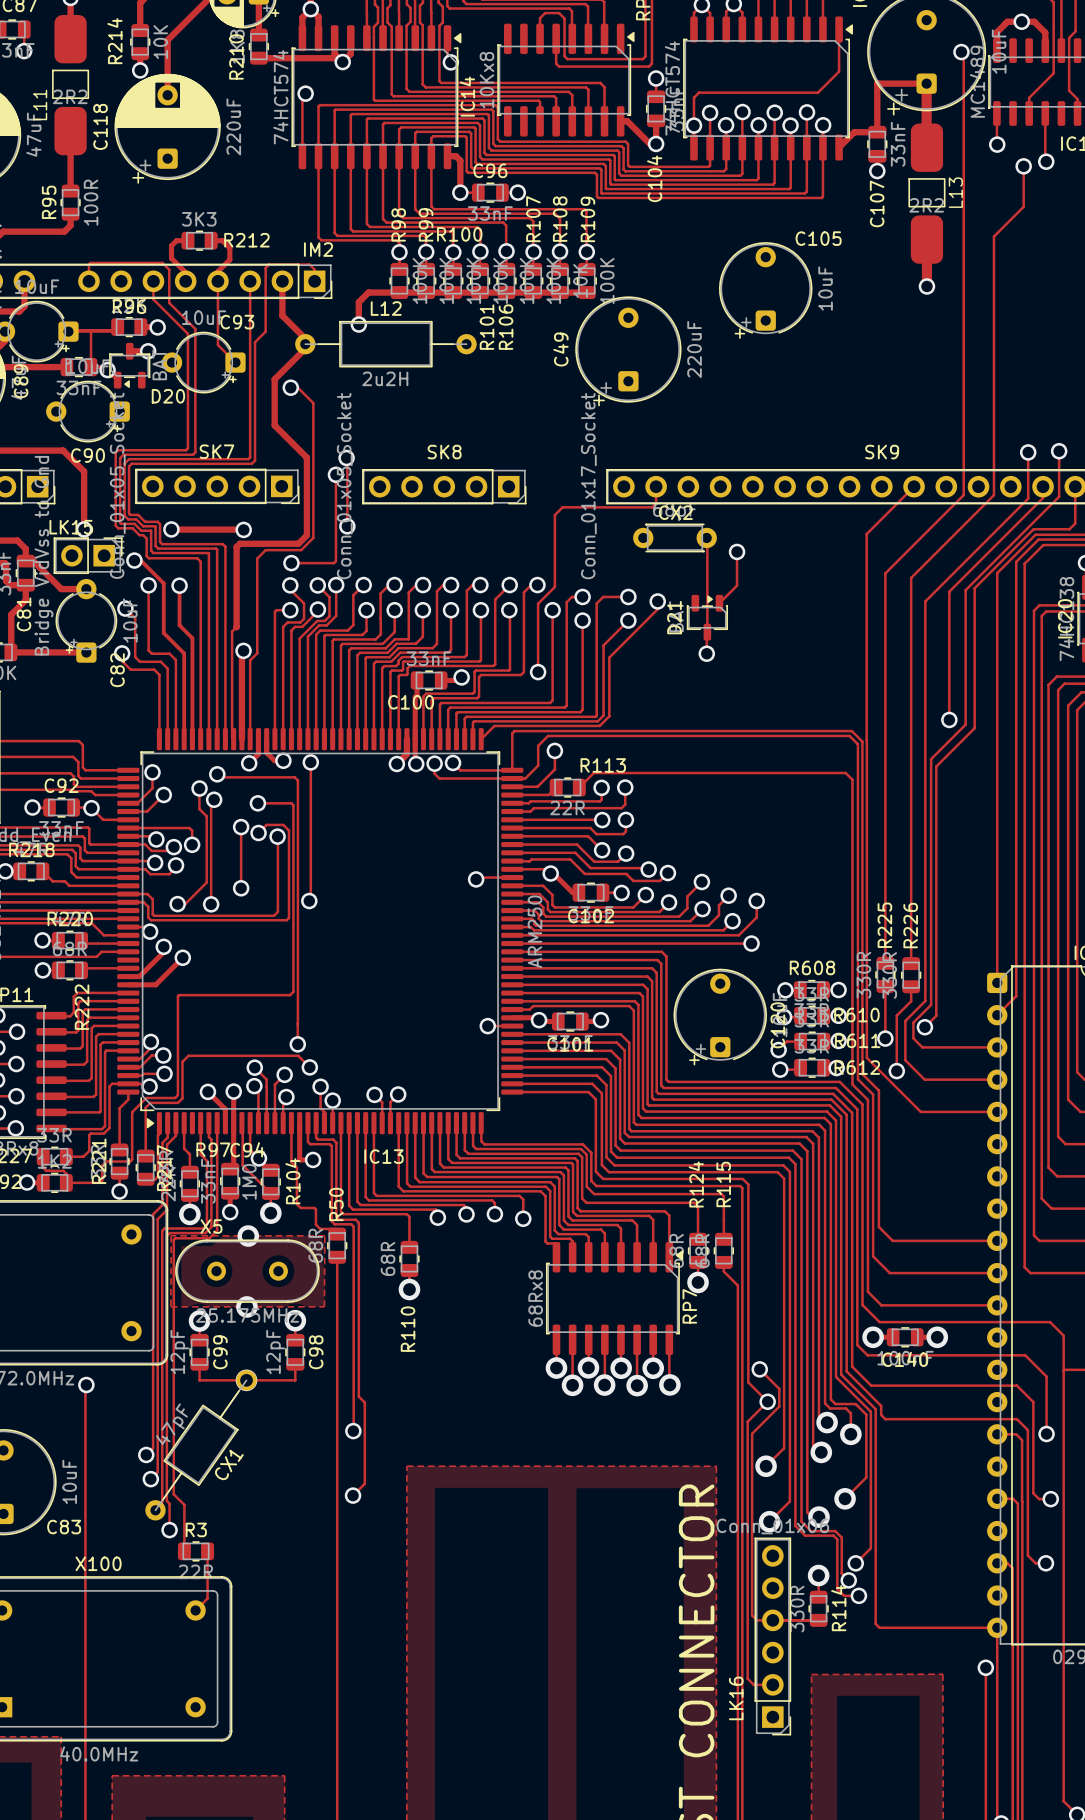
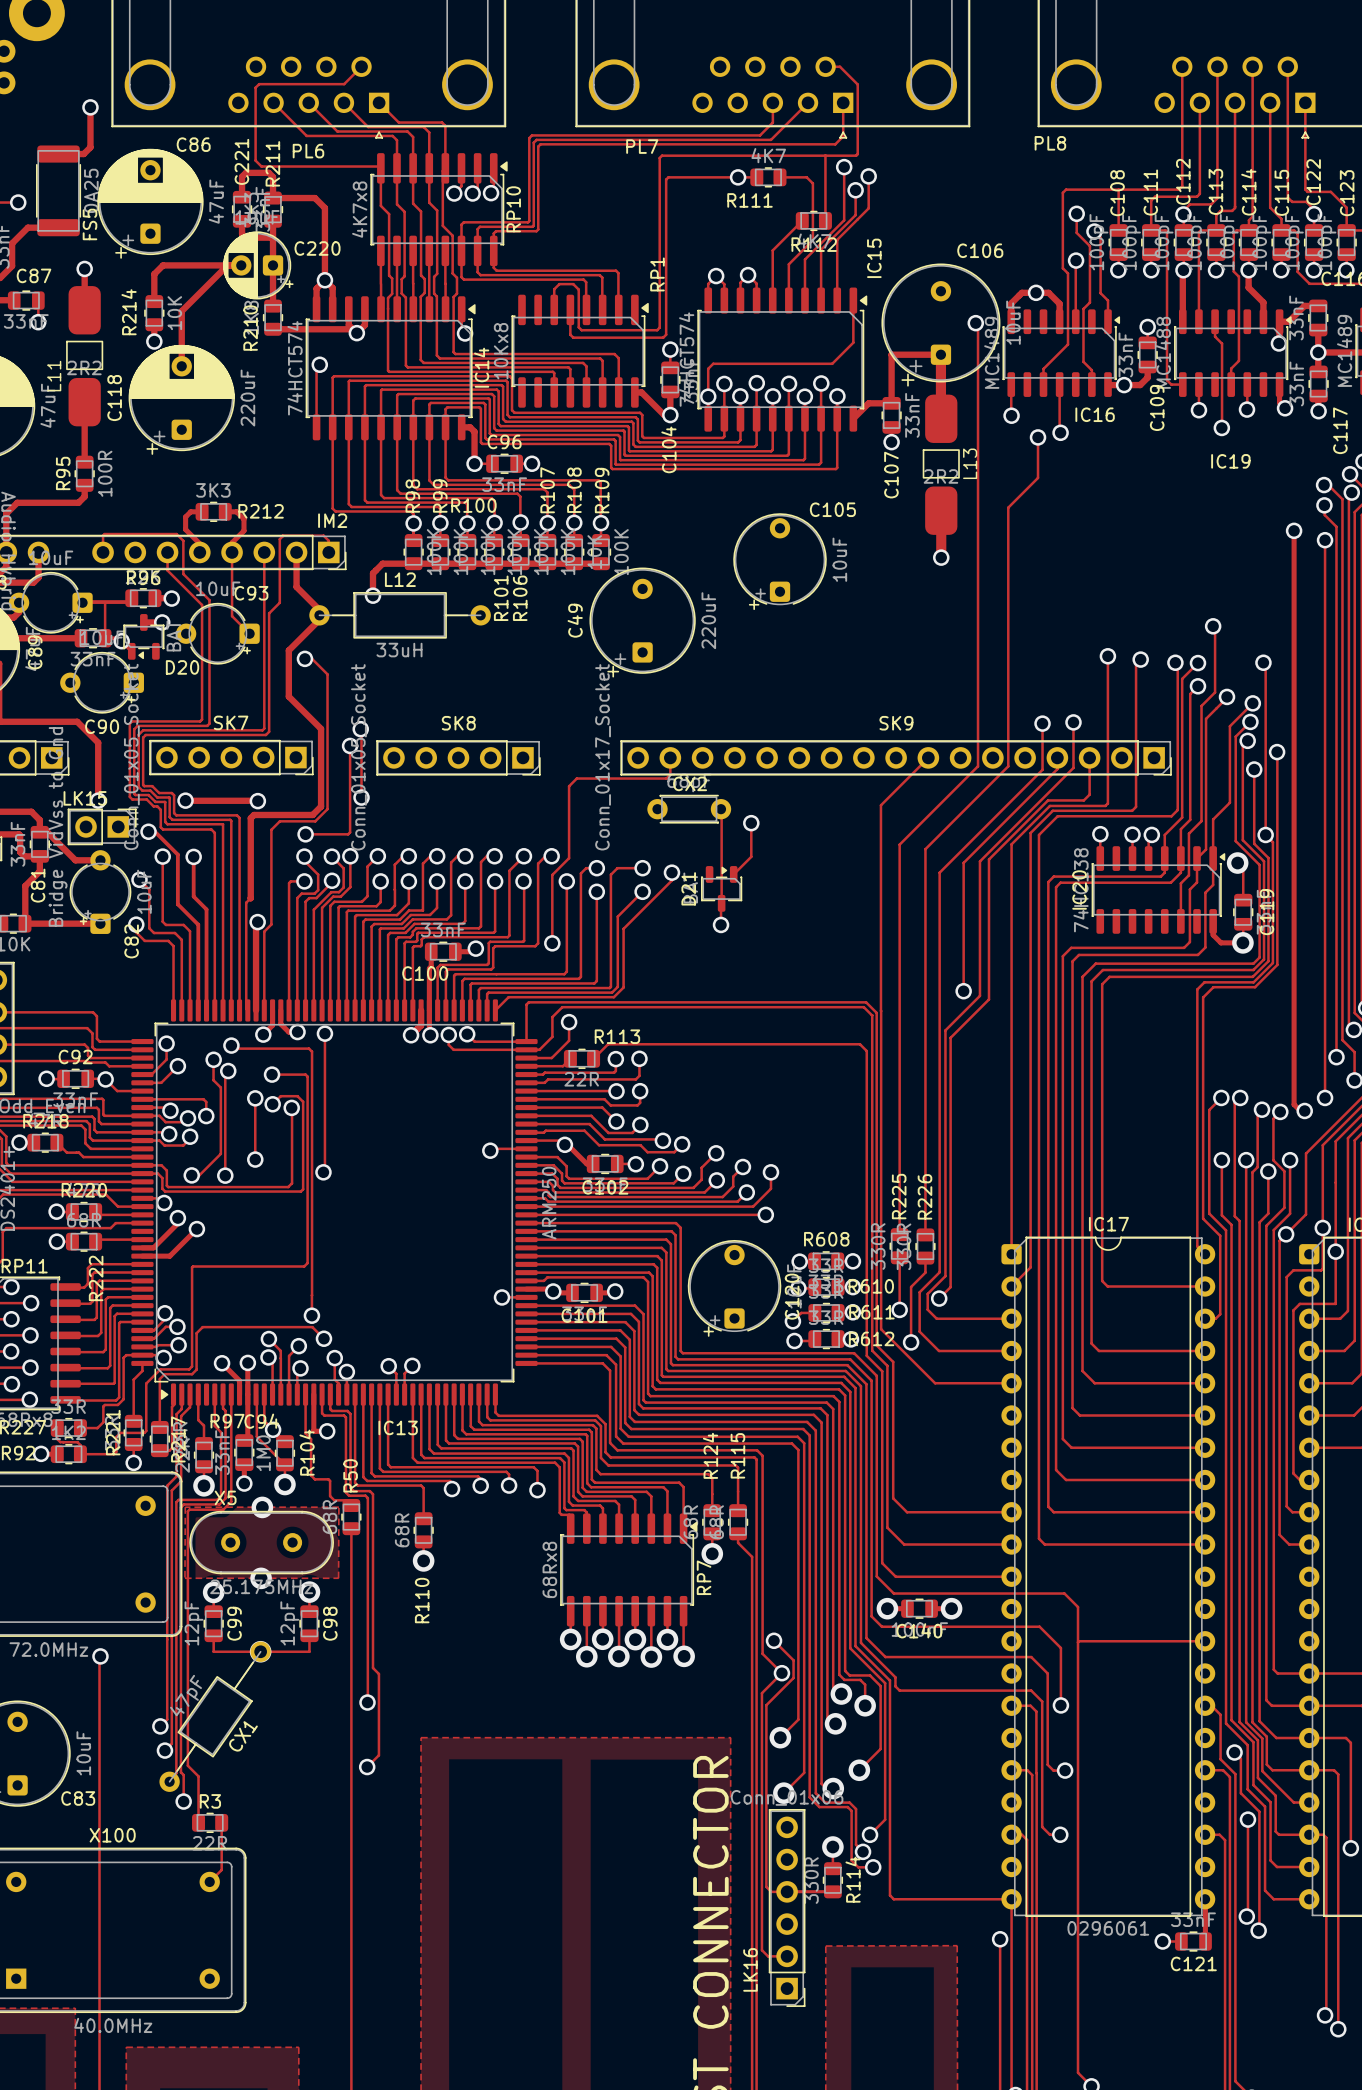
L12 value: 2u2H (385, 378) -> 33uH (399, 650)

